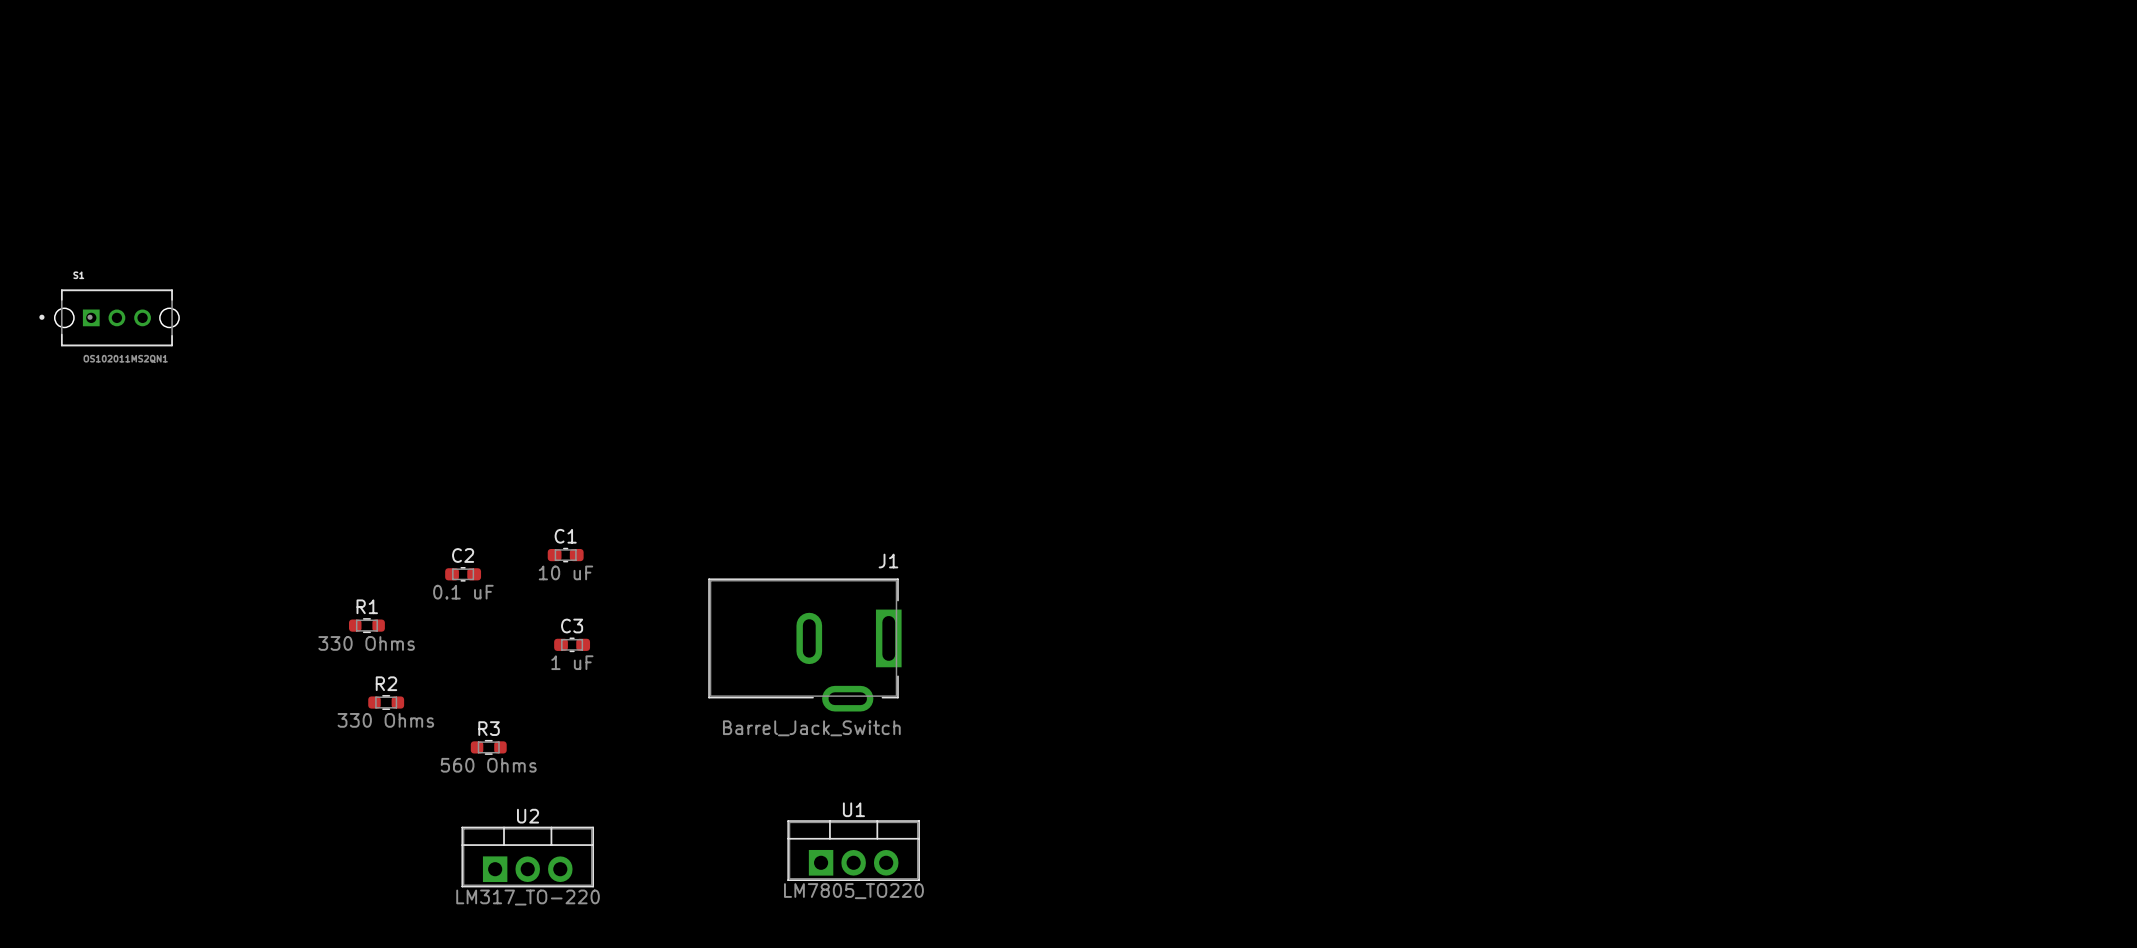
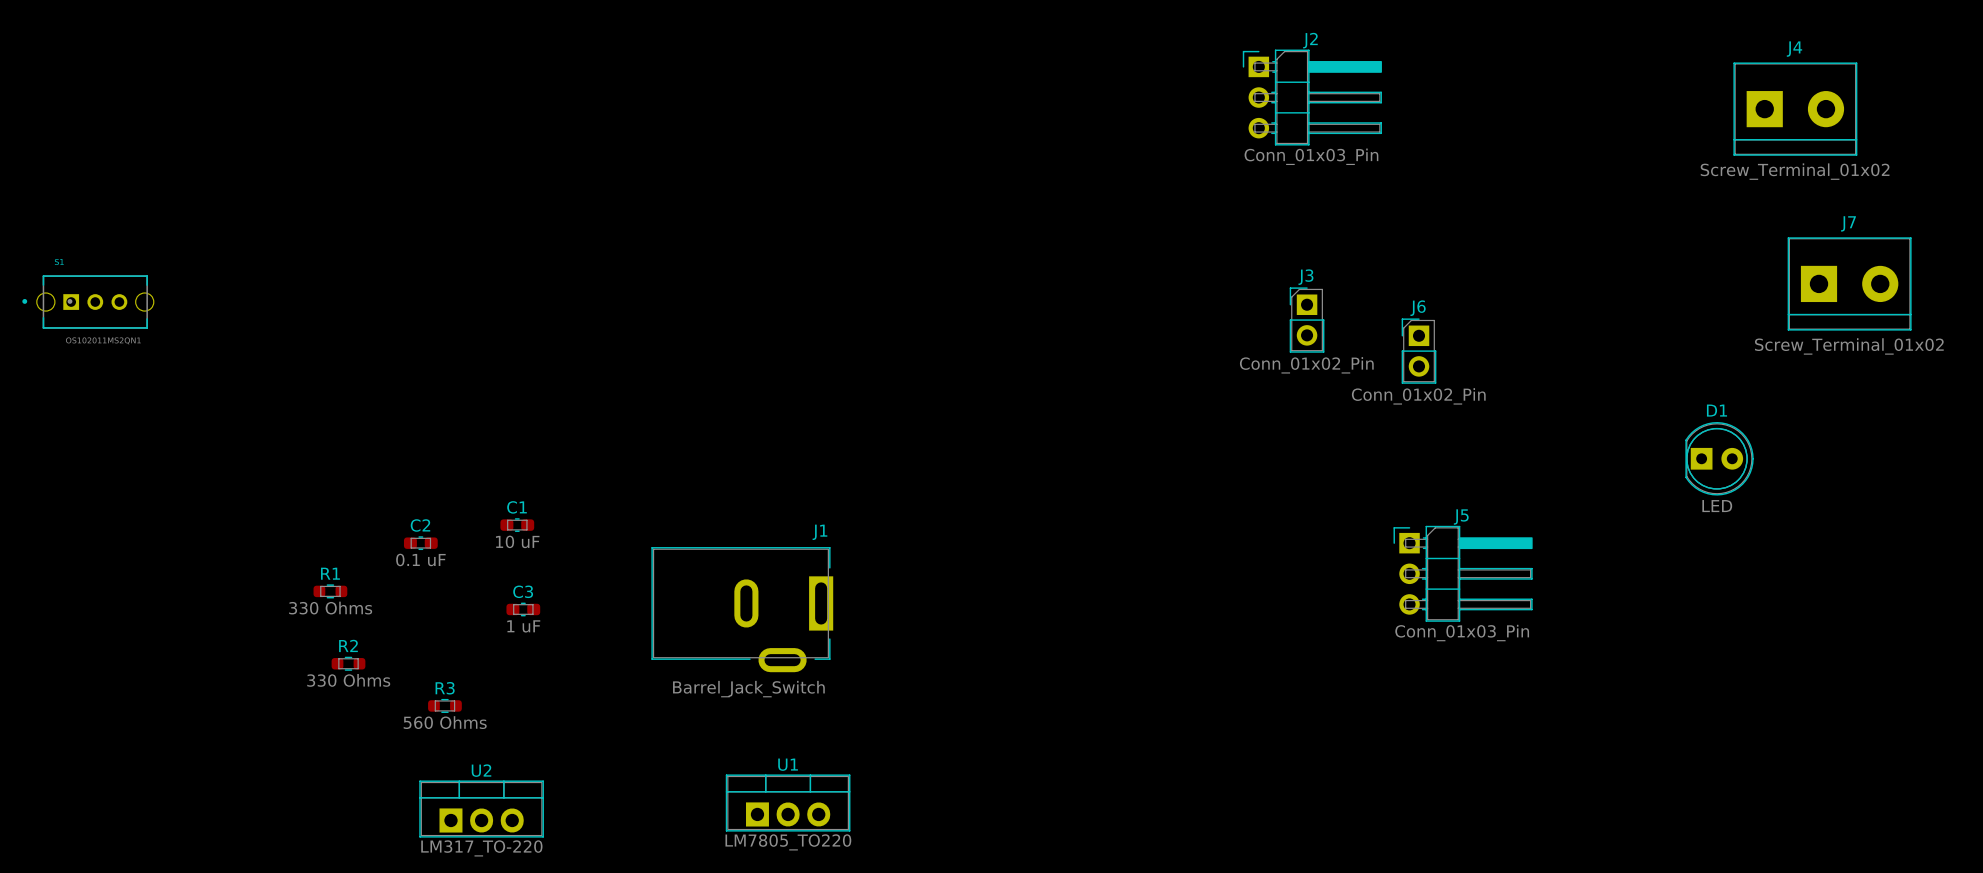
J2: none -> Conn_01x03_Pin (1312, 97)
J4: none -> Screw_Terminal_01x02 (1795, 109)
J7: none -> Screw_Terminal_01x02 (1849, 283)
J3: none -> Conn_01x02_Pin (1307, 320)
J6: none -> Conn_01x02_Pin (1419, 351)
D1: none -> LED (1719, 458)
J5: none -> Conn_01x03_Pin (1463, 573)

